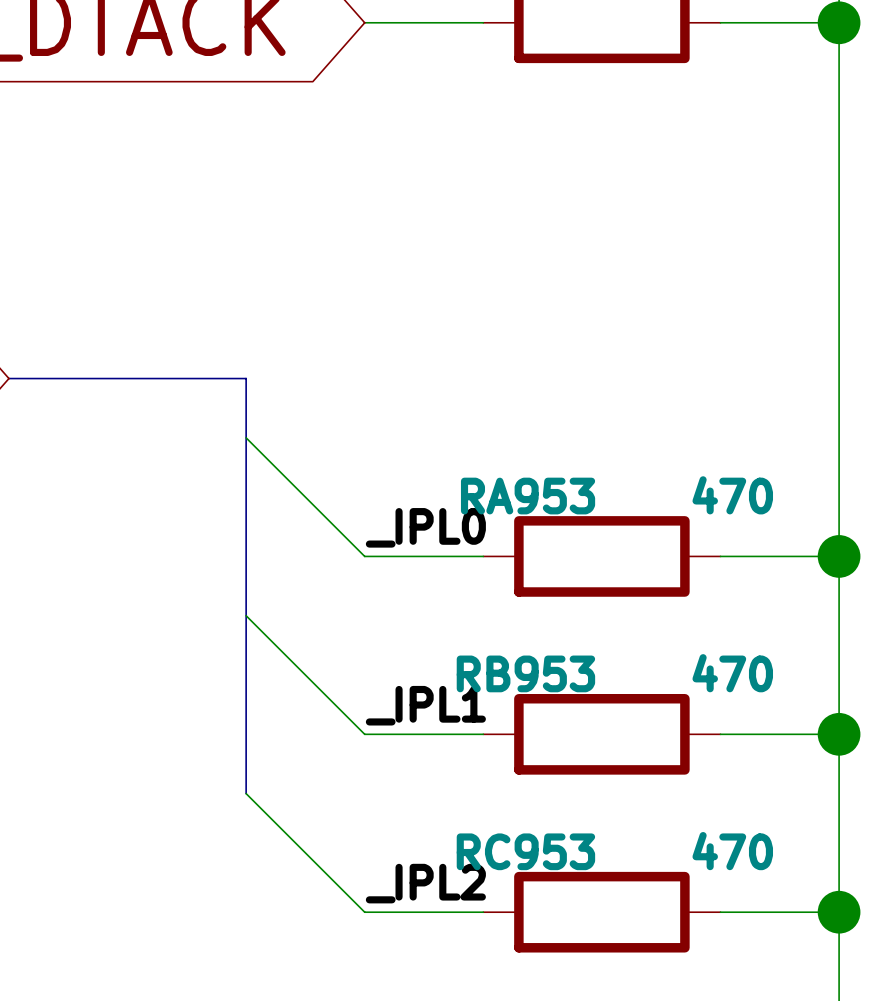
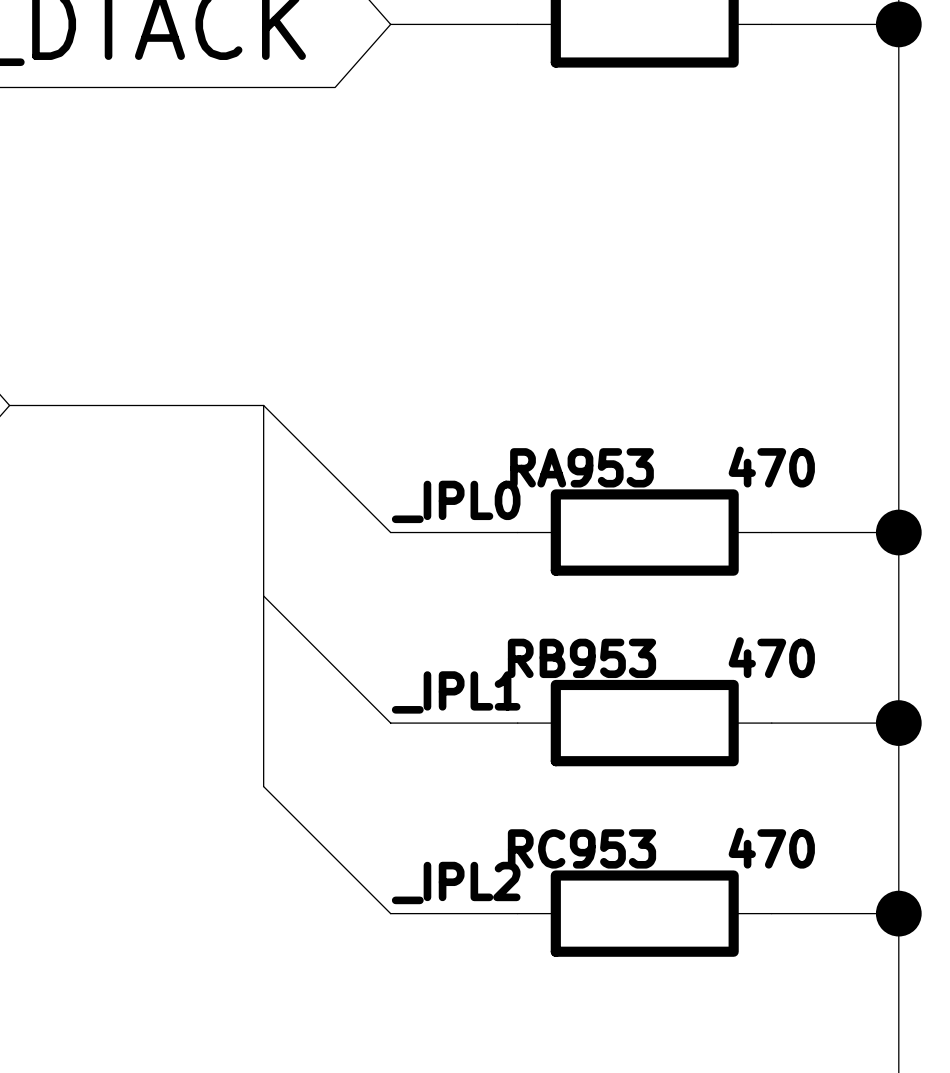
wire: (246, 437) (364, 556) (483, 556) -> (263, 405) (390, 532) (517, 532)
RA953 value position: 470 (732, 495) -> 470 (771, 467)
RA953 name position: RA953 (528, 496) -> RA953 (581, 467)
junction: none -> (898, 532)
label position: _IPL0 (425, 527) -> _IPL0 (456, 501)
RA953 position: (601, 556) -> (644, 532)
wire: (720, 556) (839, 556) -> (771, 532) (898, 532)
junction: (839, 556) -> none
wire: (246, 615) (364, 734) (483, 734) -> (263, 596) (390, 723) (517, 723)
RB953 name position: RB953 (525, 673) -> RB953 (581, 658)
RB953 value position: 470 (732, 673) -> 470 (771, 657)
junction: none -> (898, 723)
label position: _IPL1 (425, 705) -> _IPL1 (456, 692)
bus: (246, 734) (246, 793) -> none
RB953 position: (601, 734) -> (644, 723)
wire: (720, 734) (839, 734) -> (771, 723) (898, 723)
junction: (839, 734) -> none
wire: (246, 793) (364, 912) (483, 912) -> (263, 786) (390, 913) (517, 913)
RC953 name position: RC953 (525, 851) -> RC953 (581, 848)
RC953 value position: 470 (732, 851) -> 470 (771, 848)
junction: none -> (898, 913)
label position: _IPL2 (425, 883) -> _IPL2 (456, 882)
RC953 position: (601, 912) -> (644, 913)
wire: (720, 912) (839, 912) -> (771, 913) (898, 913)
junction: (839, 912) -> none

